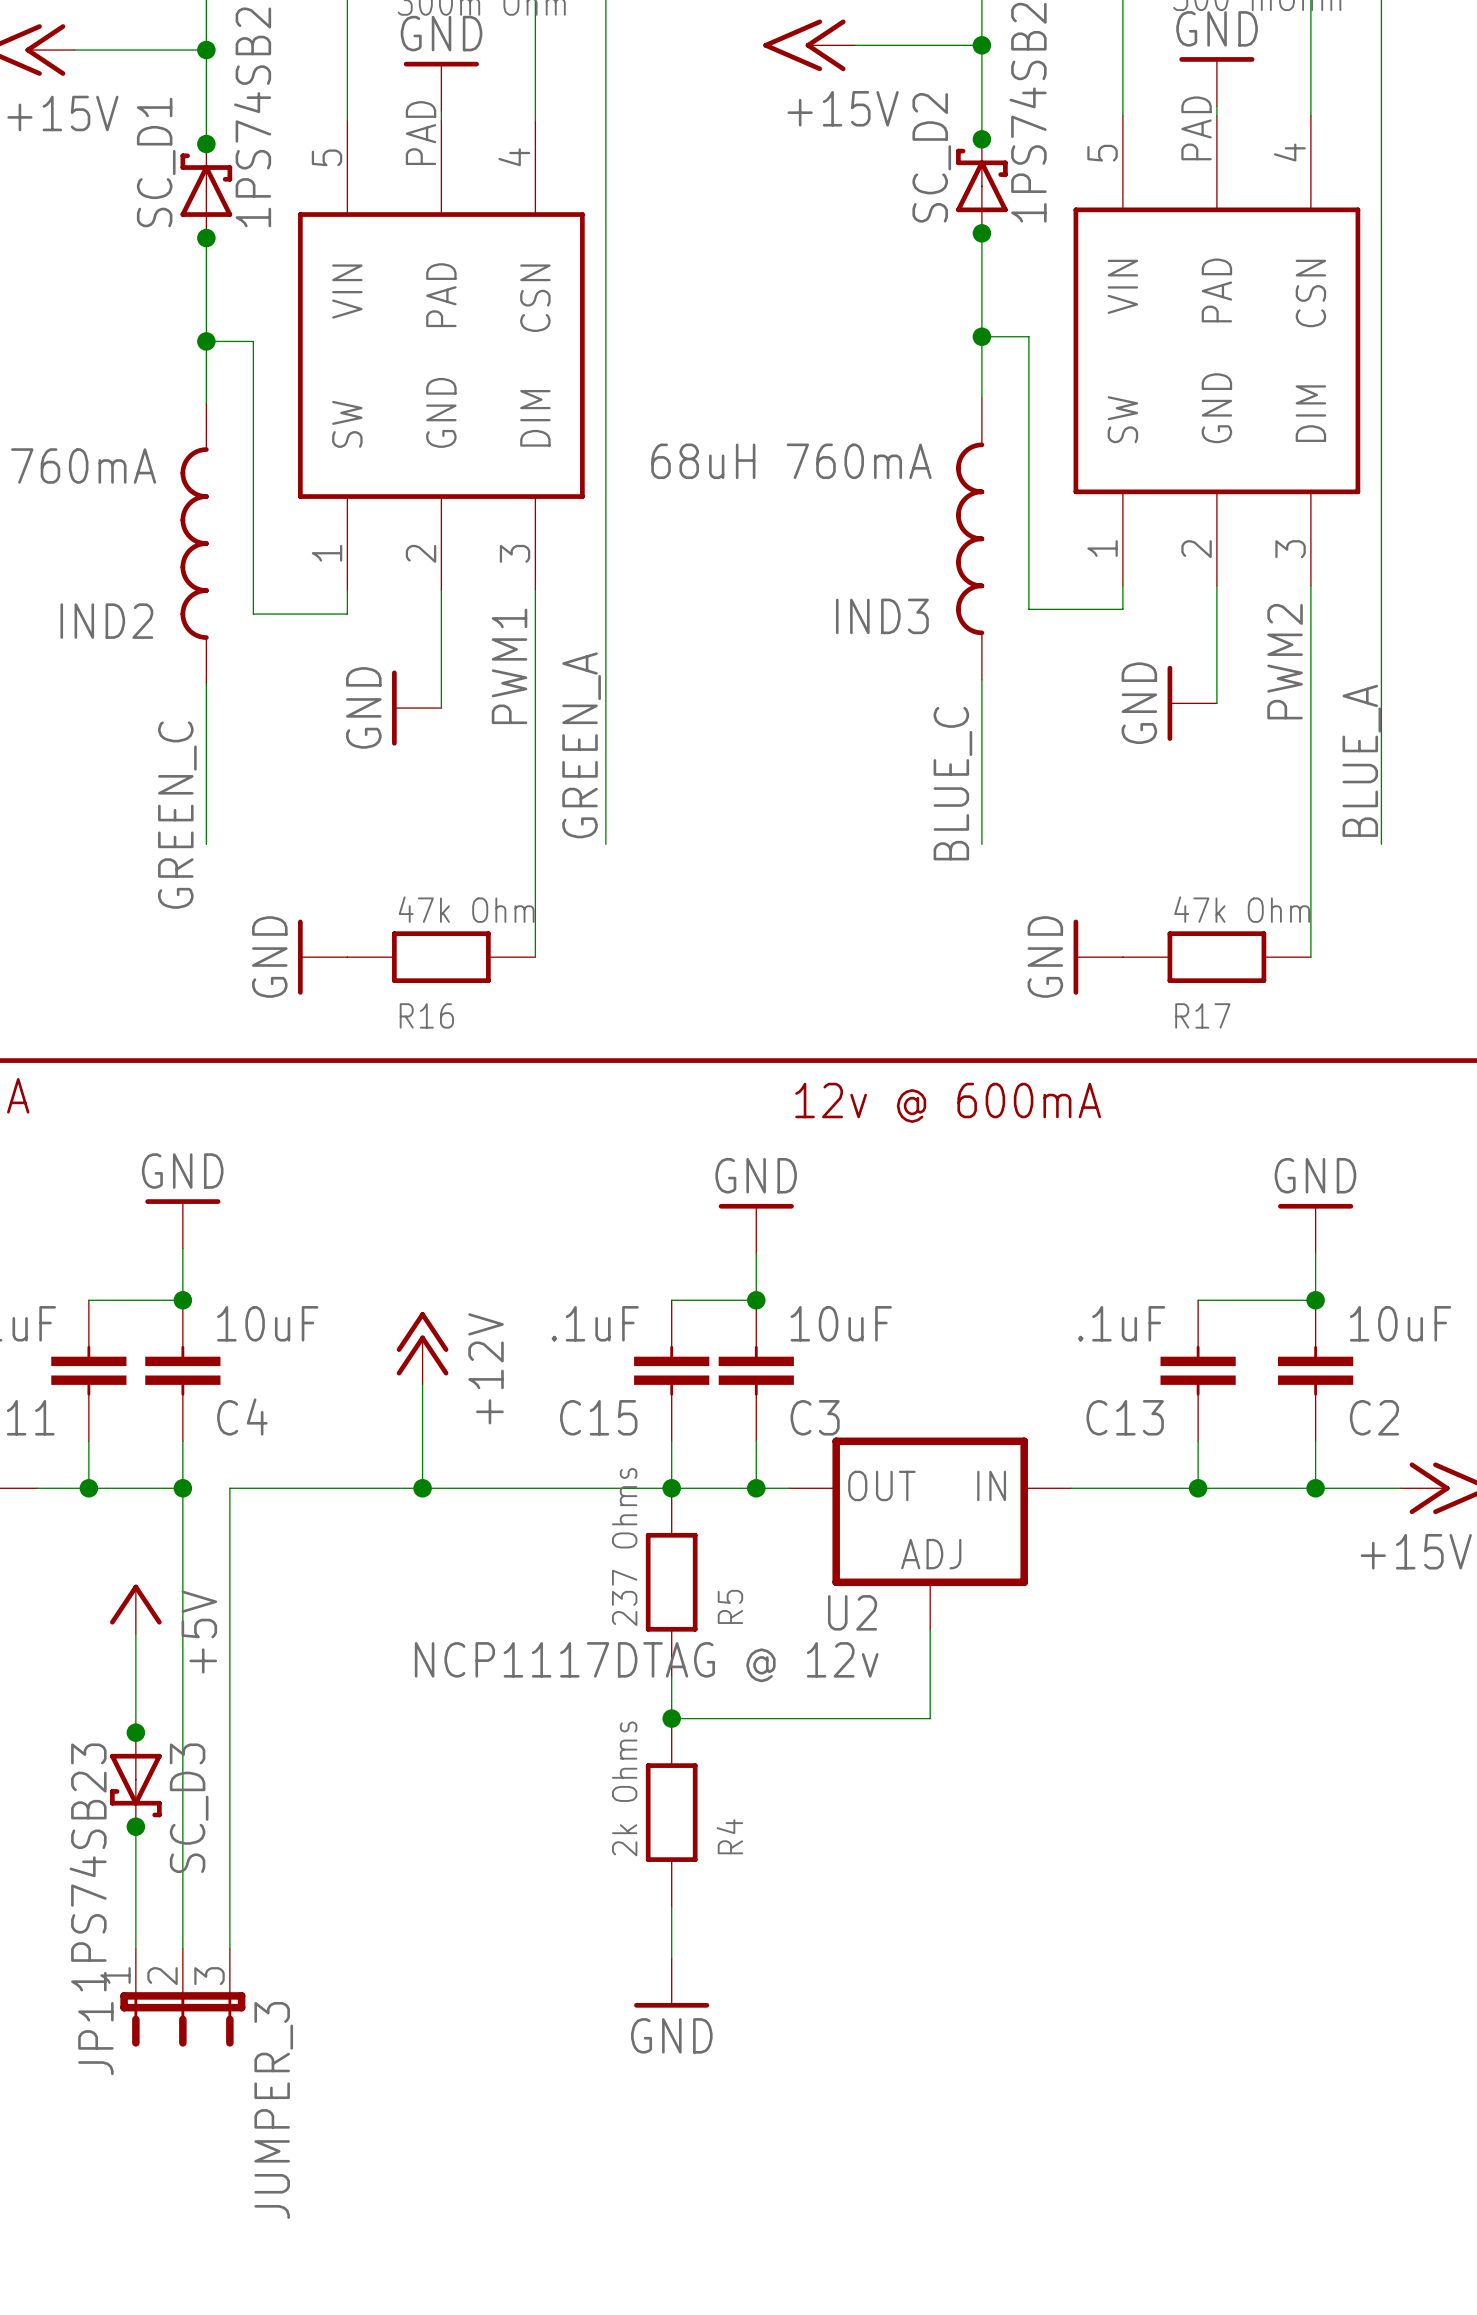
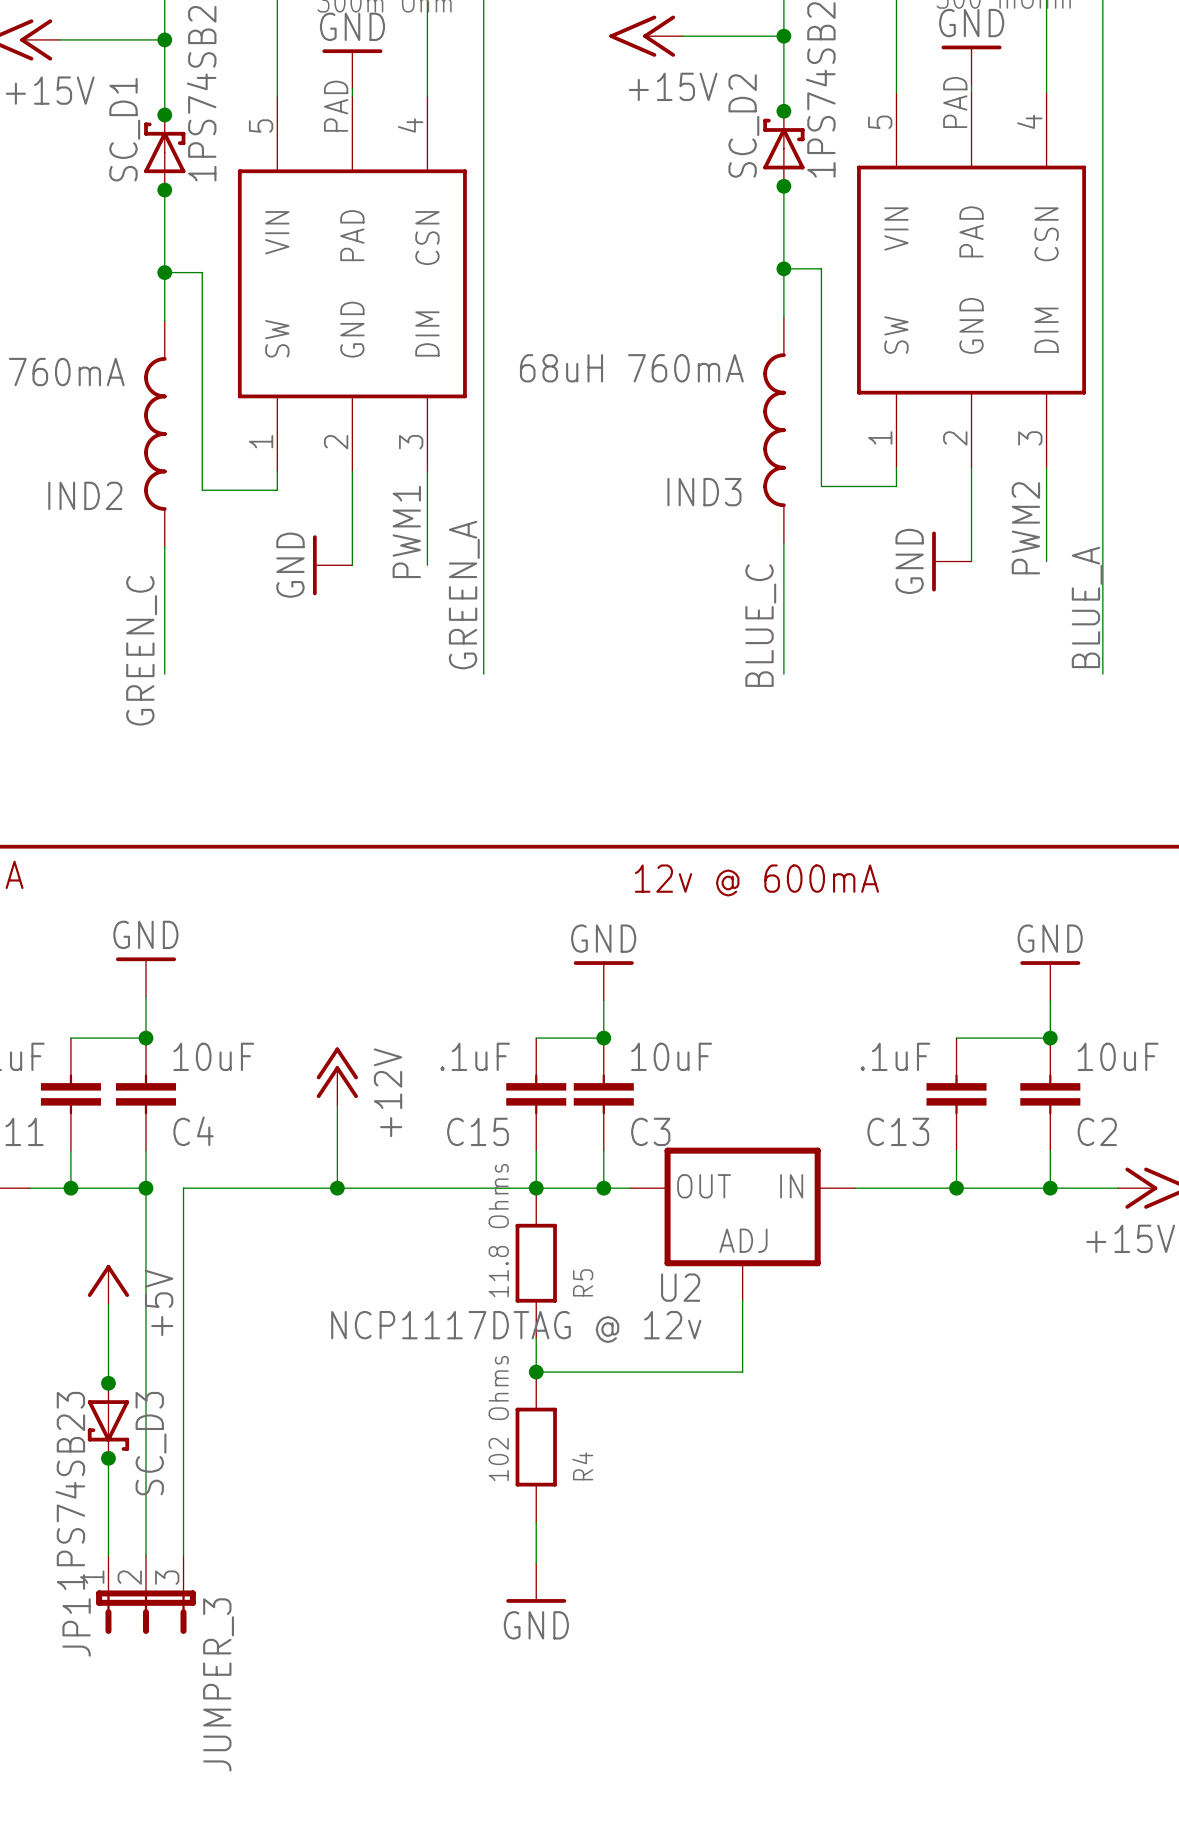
wire: (1310, 703) (1310, 957) -> none
wire: (535, 708) (535, 957) -> none
power symbol: GND (322, 957) -> none
R16: 47k Ohm (441, 957) -> none
power symbol: GND (1098, 957) -> none
R17: 47k Ohm (1216, 957) -> none
R5 value: 237 Ohms (624, 1546) -> 11.8 Ohms (498, 1230)
R4 value: 2k Ohms (624, 1788) -> 102 Ohms (498, 1418)

